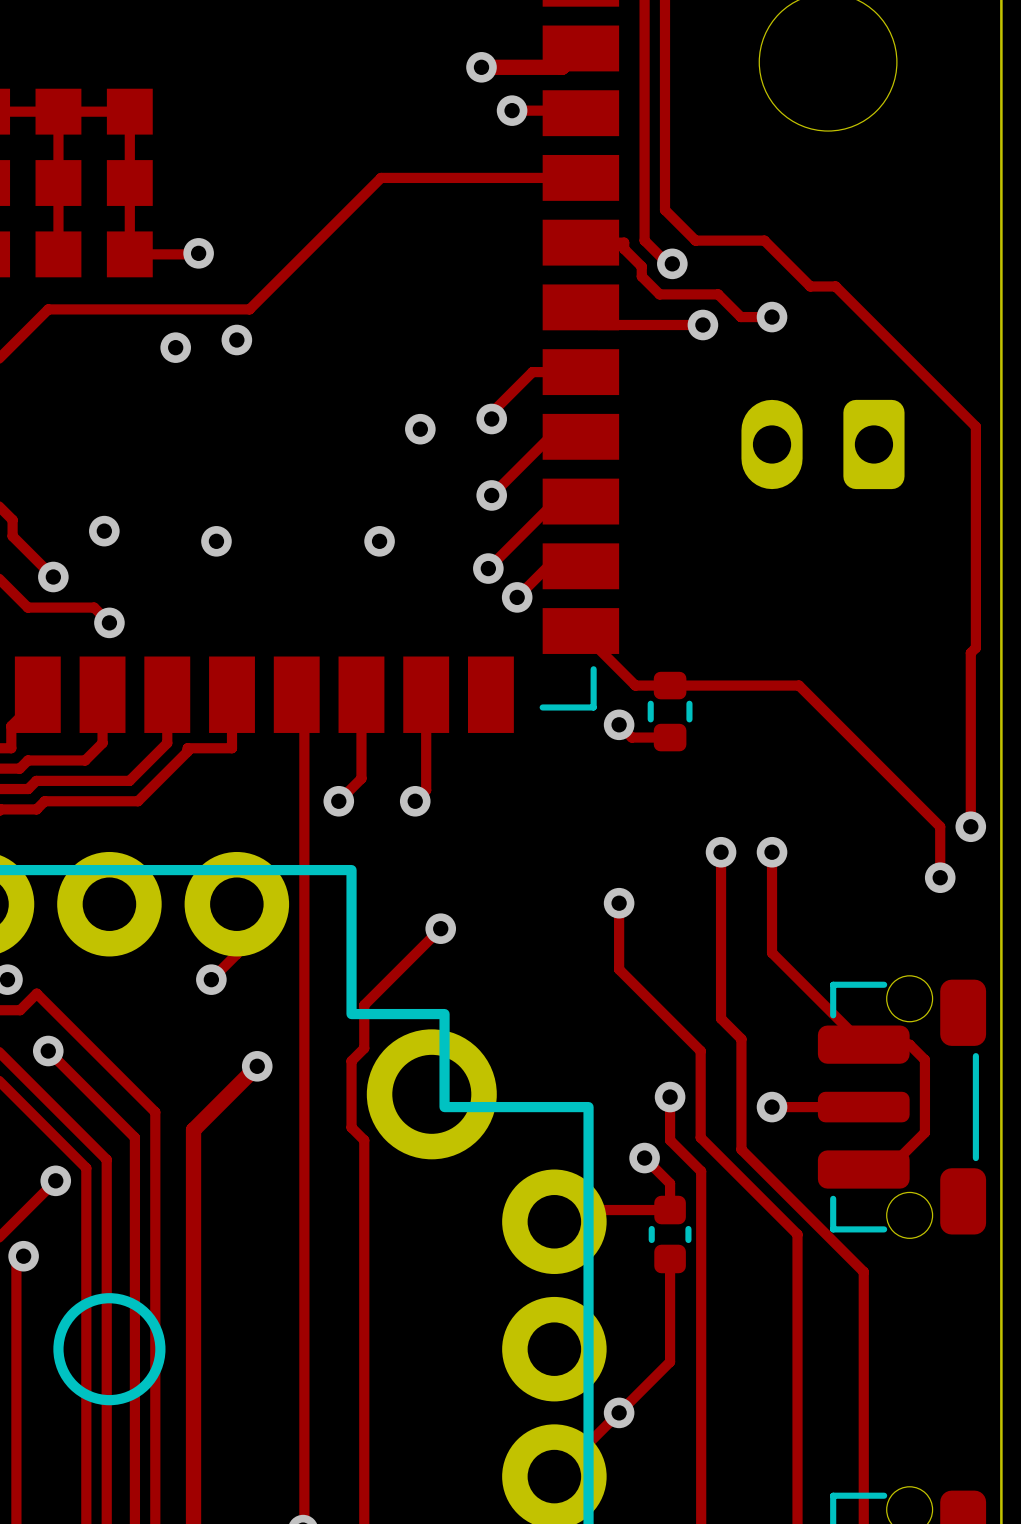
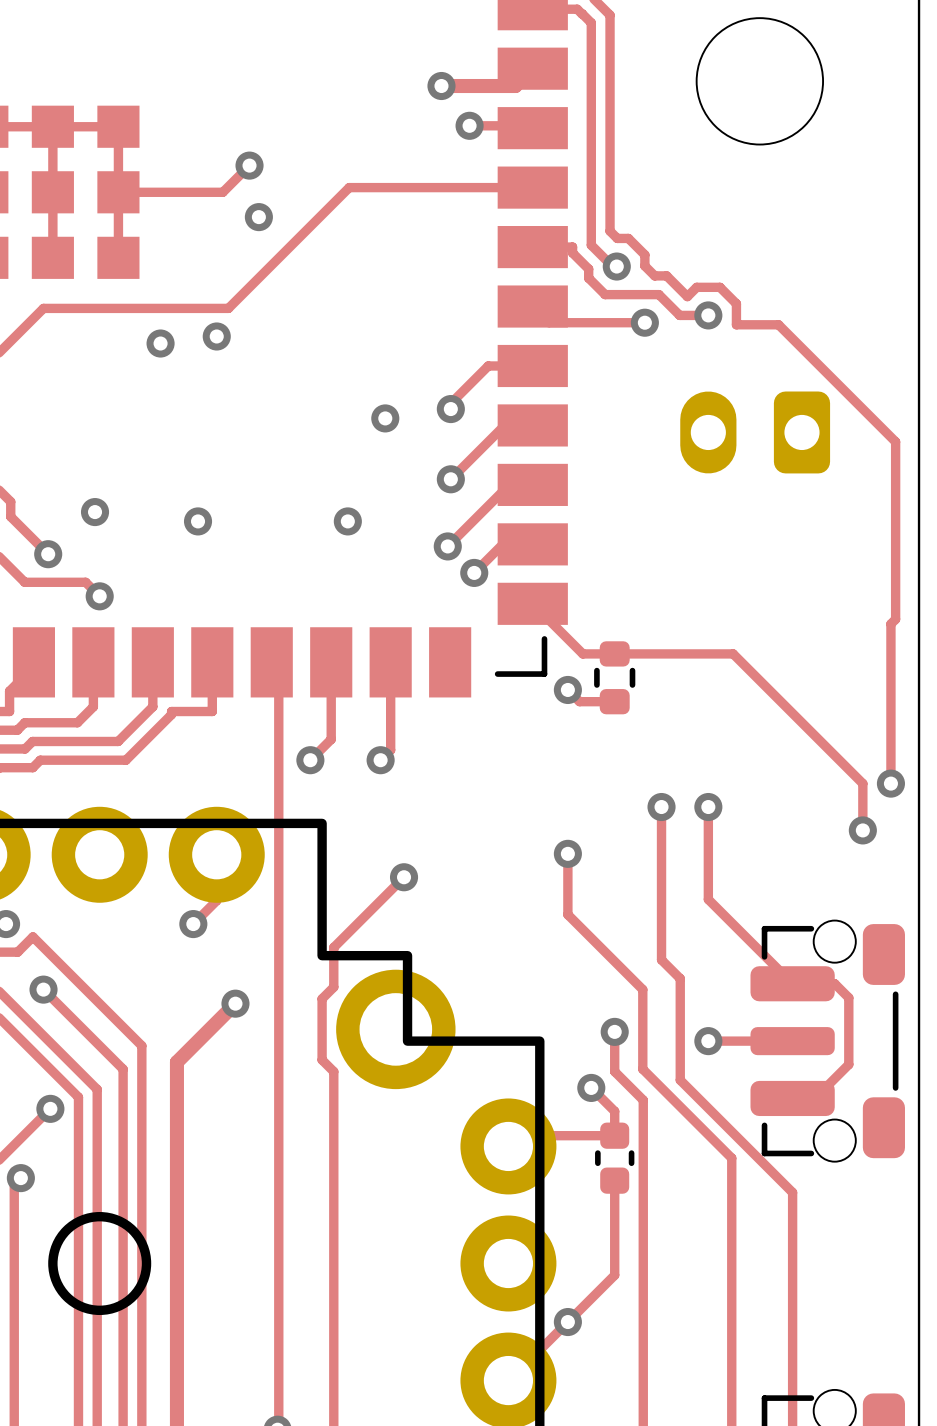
track: none -> (249, 165) (222, 192) (118, 192)
via: none -> (249, 165)
via: none -> (258, 217)
track: (664, 210) (695, 240) (764, 240) (810, 286) (835, 286) (975, 426) (975, 454) -> (610, 217) (610, 231) (617, 238) (628, 238) (644, 254) (644, 265) (654, 275) (666, 275) (687, 296) (696, 287) (719, 287) (736, 303) (736, 324) (778, 324) (895, 441)
track: (198, 253) (129, 254) -> none
via: (198, 253) -> none

